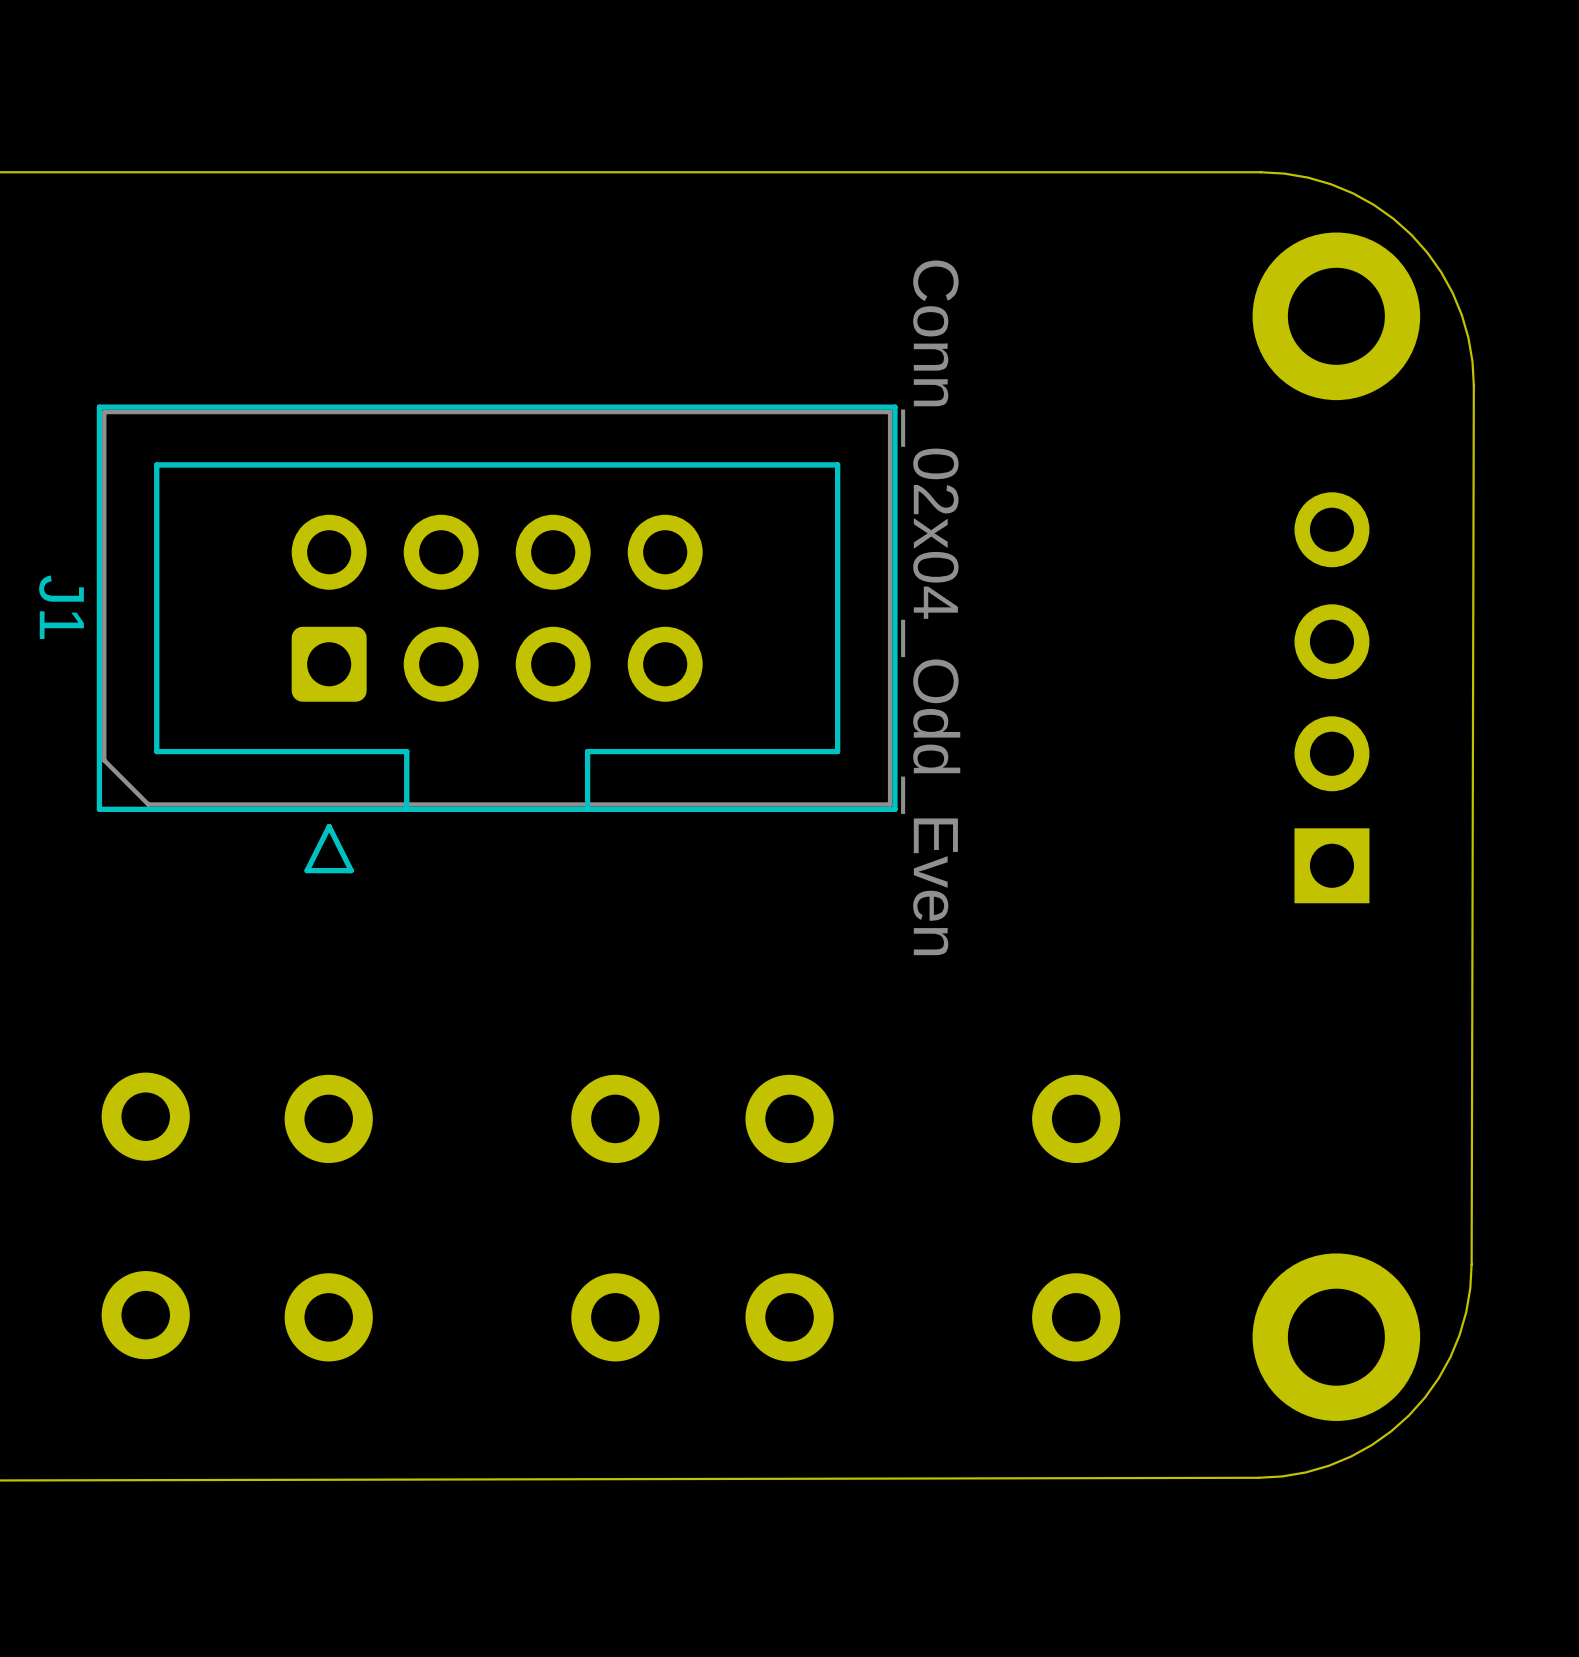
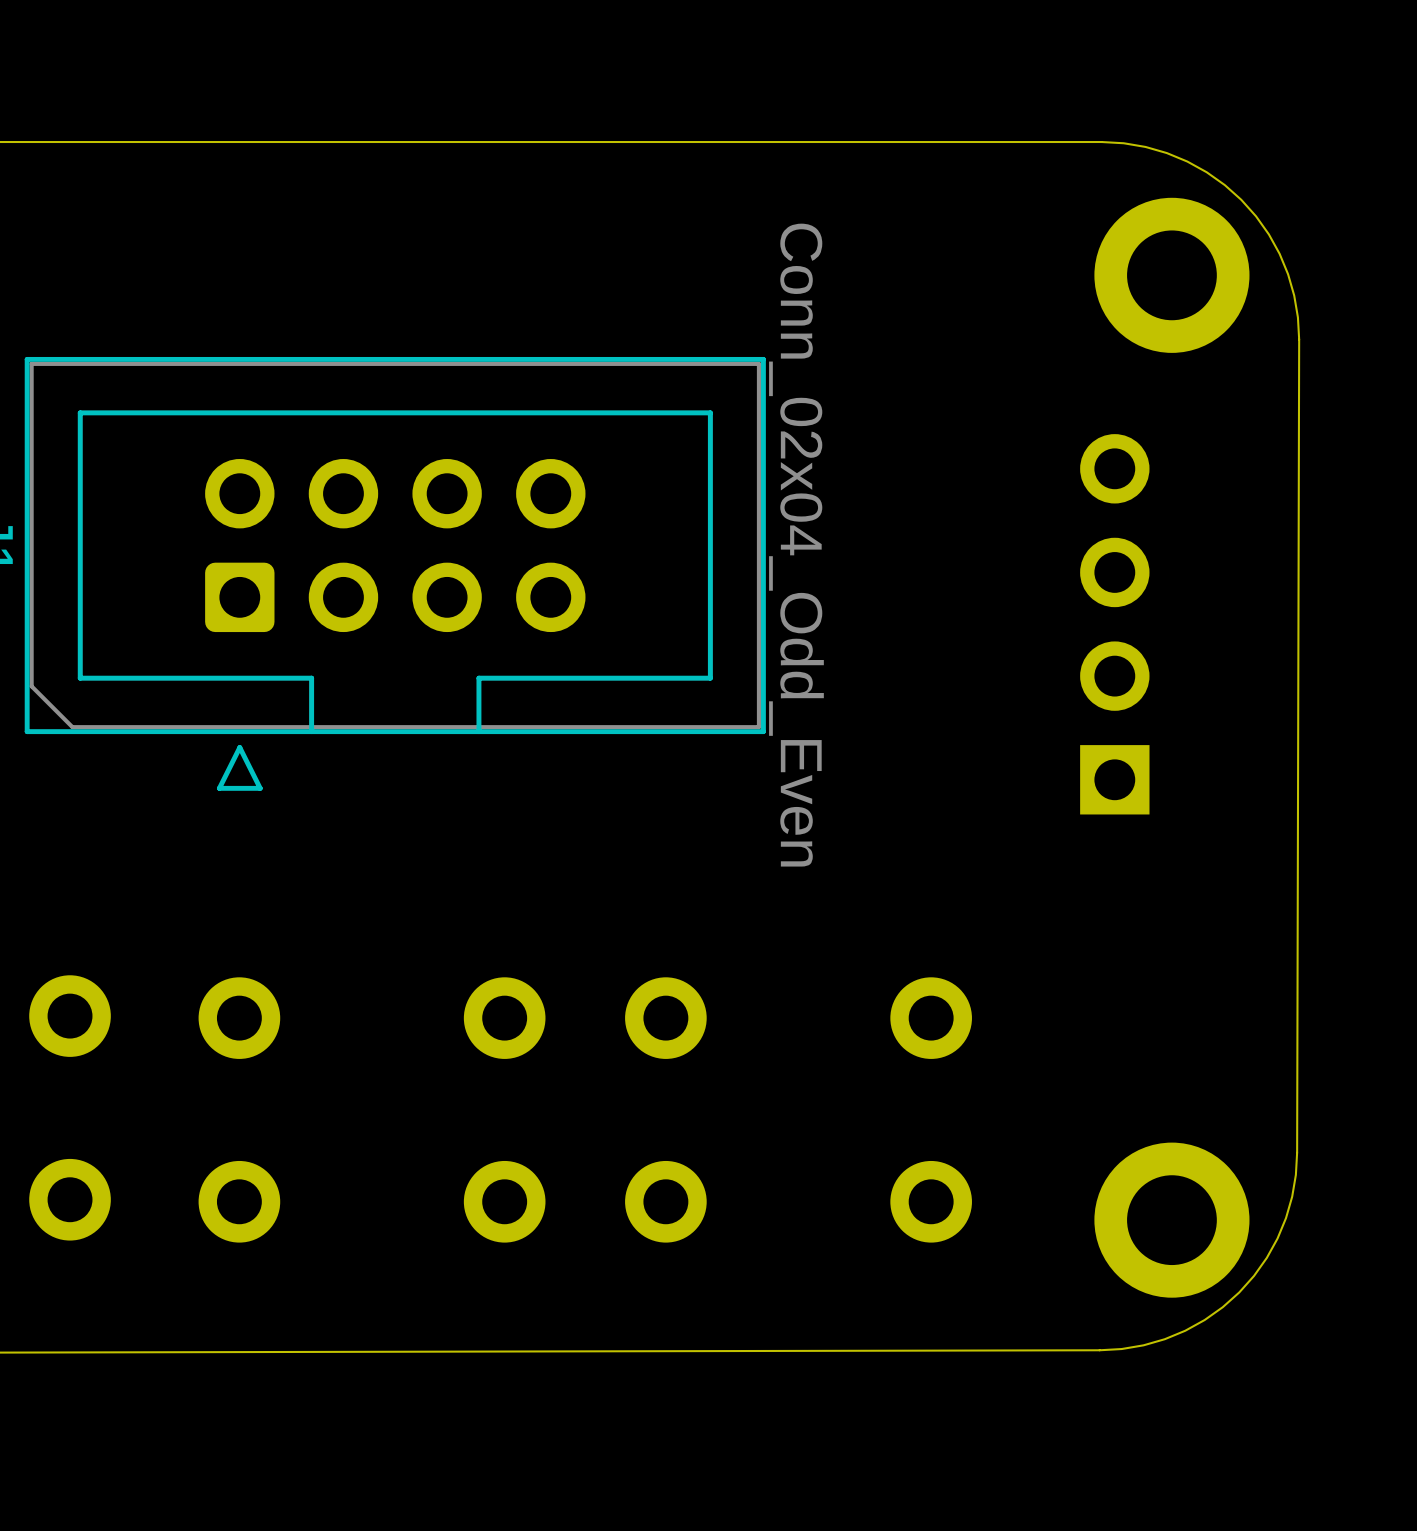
part position: (1331, 697) -> (1114, 624)

